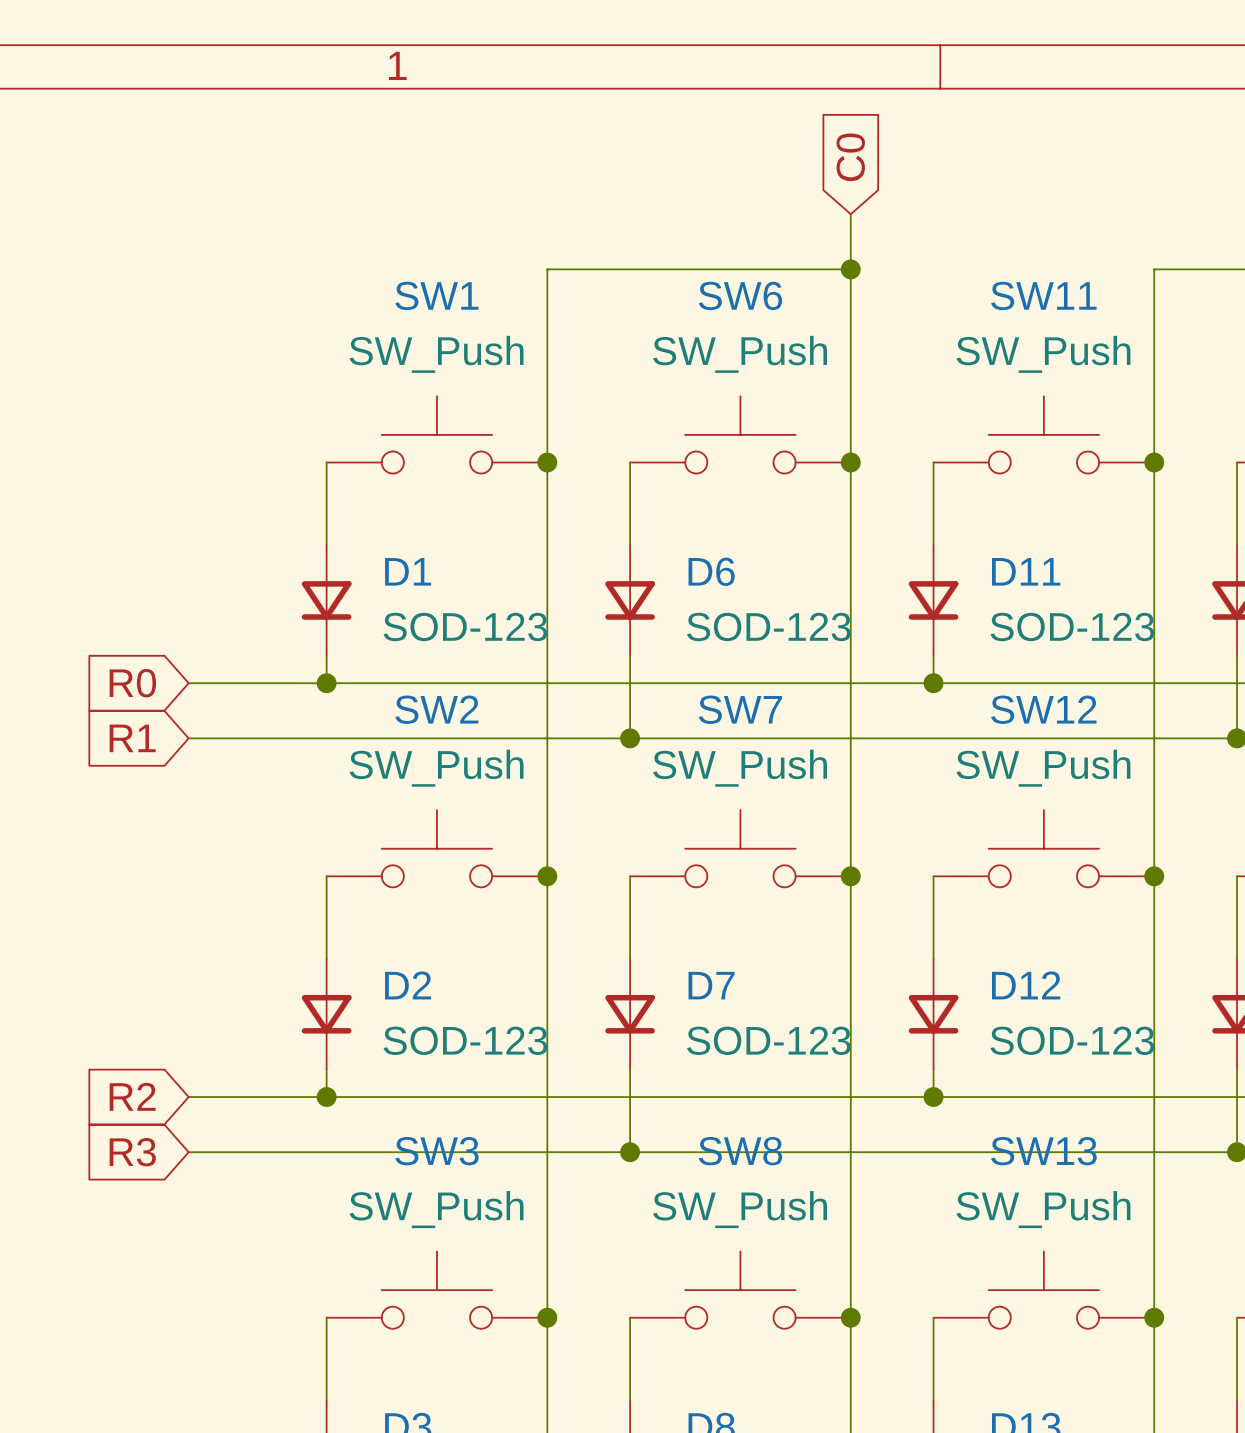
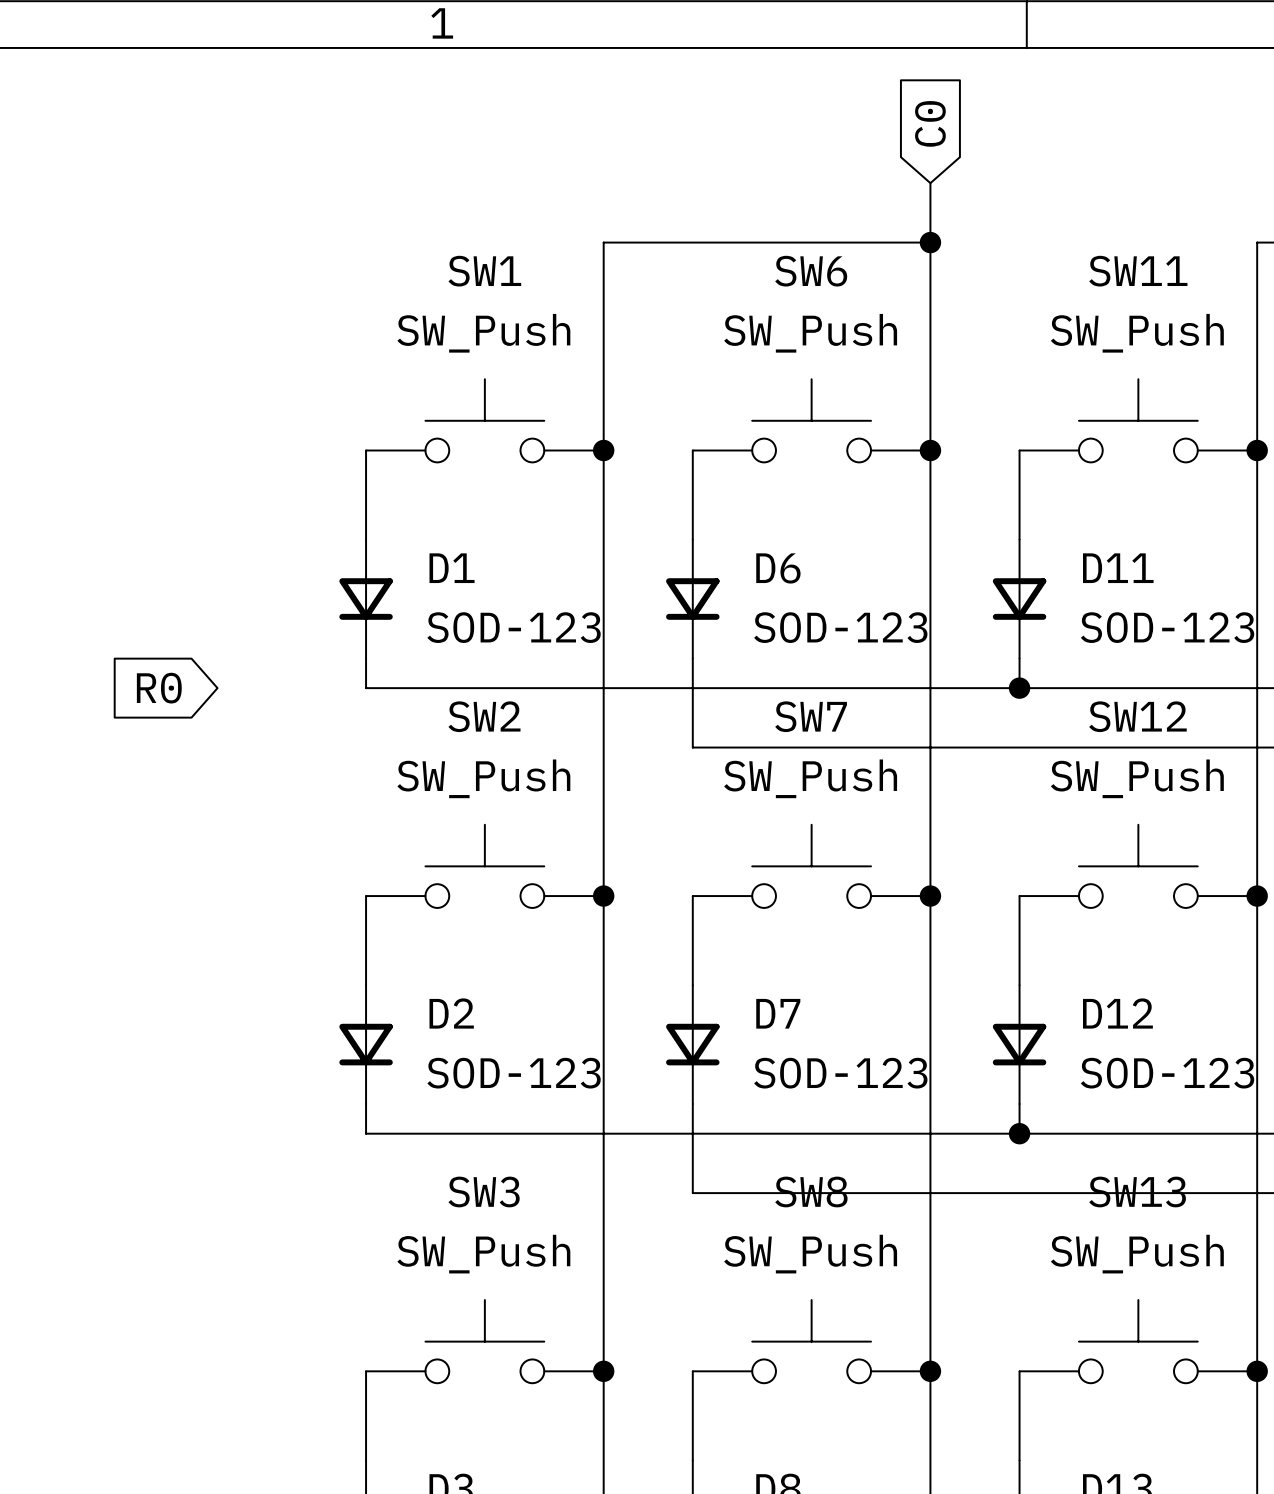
wire: (188, 683) (326, 683) -> none
junction: (326, 683) -> none
global label: R1 (132, 738) -> none
wire: (188, 738) (630, 738) -> none
junction: (630, 738) -> none
global label: R2 (132, 1096) -> none
wire: (188, 1097) (326, 1097) -> none
junction: (326, 1097) -> none
global label: R3 (132, 1152) -> none
wire: (188, 1152) (630, 1152) -> none
junction: (630, 1152) -> none

